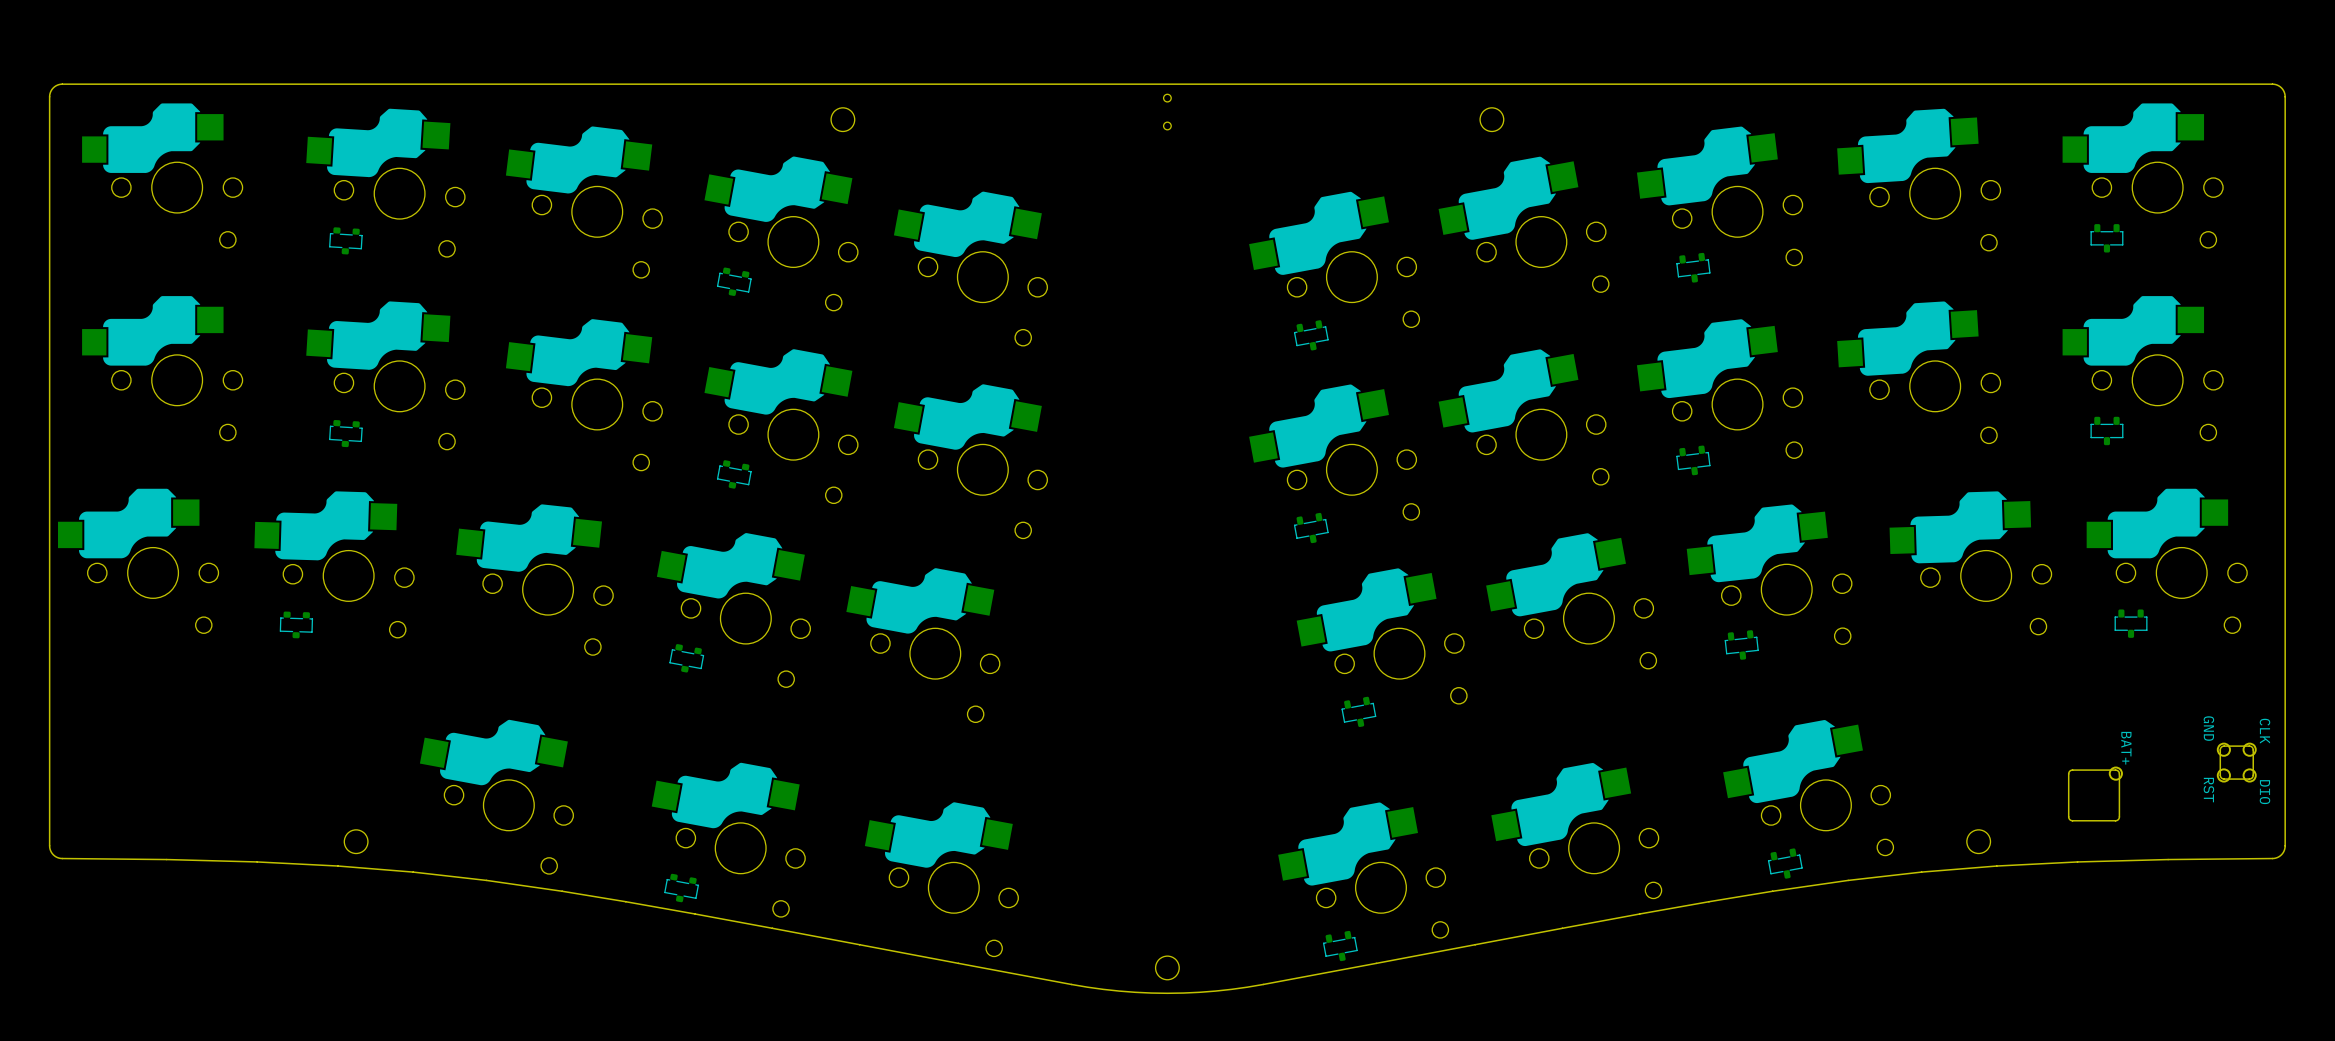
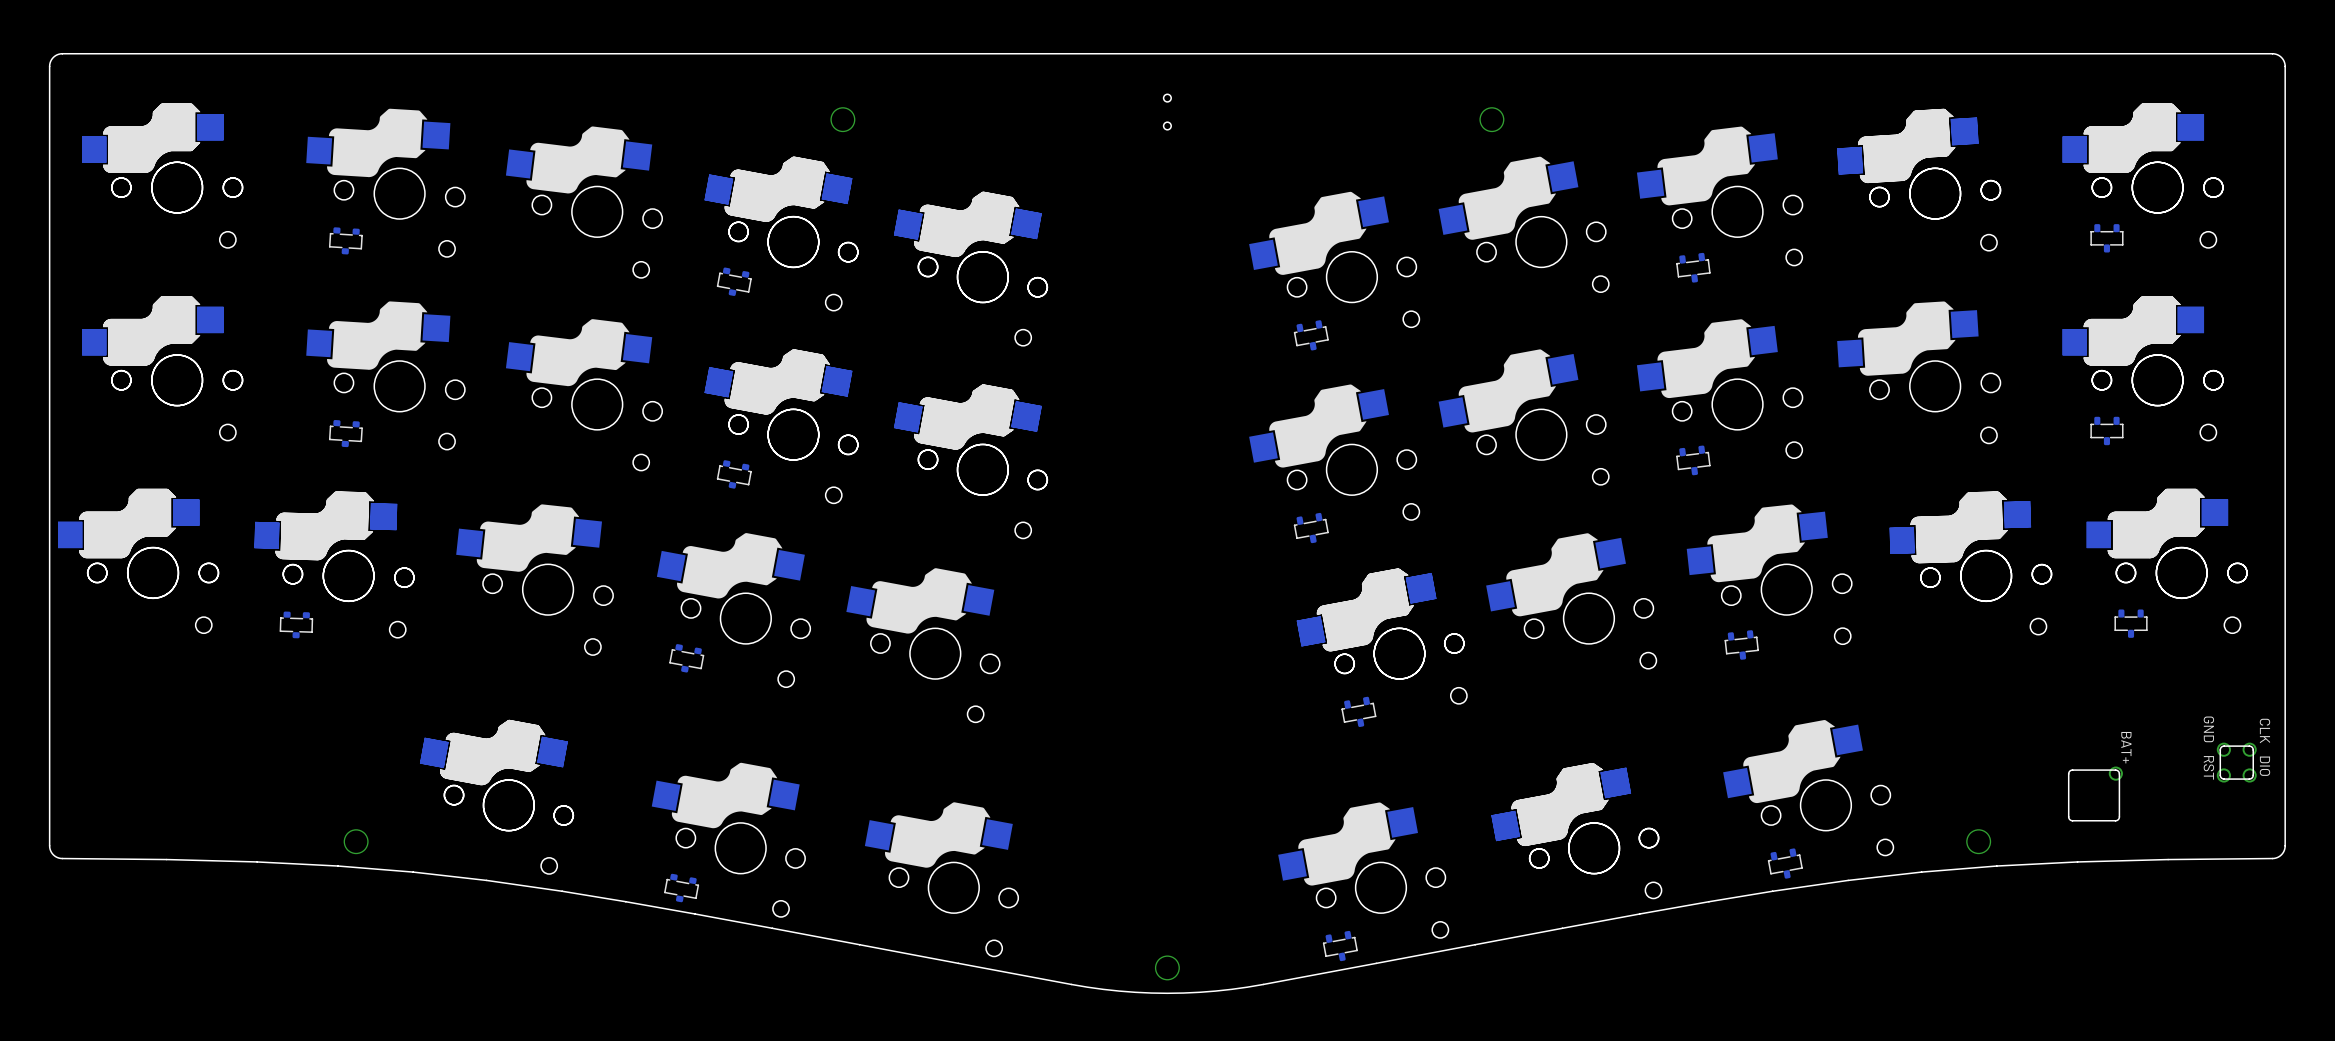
drawing: none -> [48, 52, 2286, 995]
drawing: [48, 83, 2286, 995] -> none
part: none -> (162, 158)
part: none -> (2142, 158)
part: none -> (1918, 163)
part: none -> (781, 211)
part: none -> (970, 247)
part: none -> (162, 350)
part: none -> (2142, 350)
part: none -> (781, 404)
part: none -> (970, 439)
part: none -> (138, 543)
part: none -> (2166, 543)
part: none -> (334, 546)
part: none -> (1970, 546)
part: none -> (1380, 623)
part: none -> (496, 775)
part: none -> (1574, 818)

